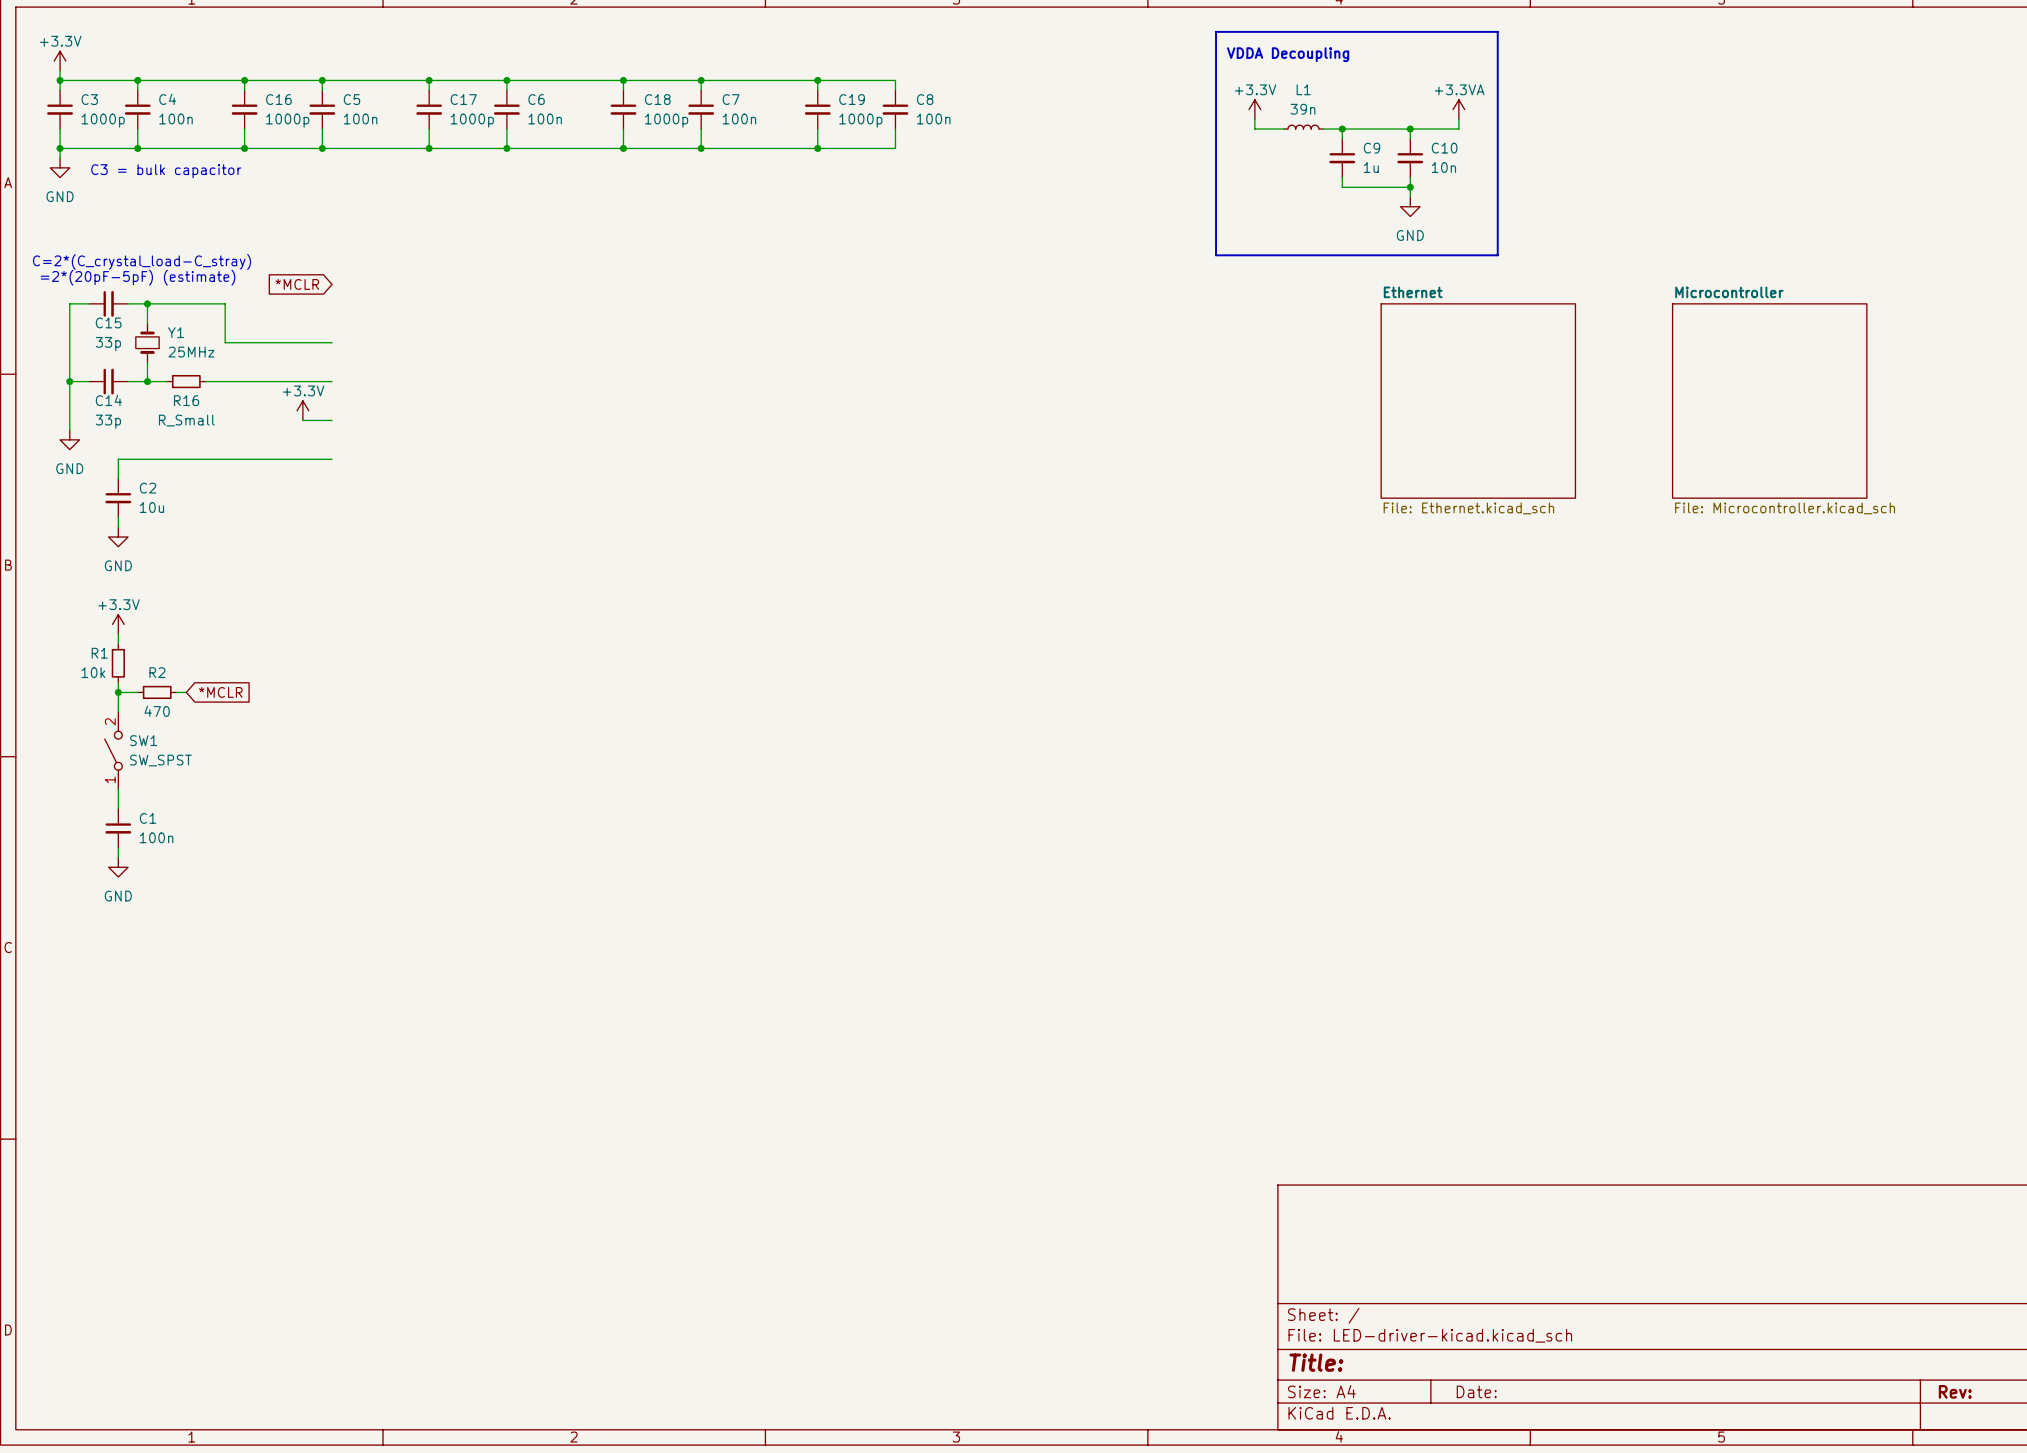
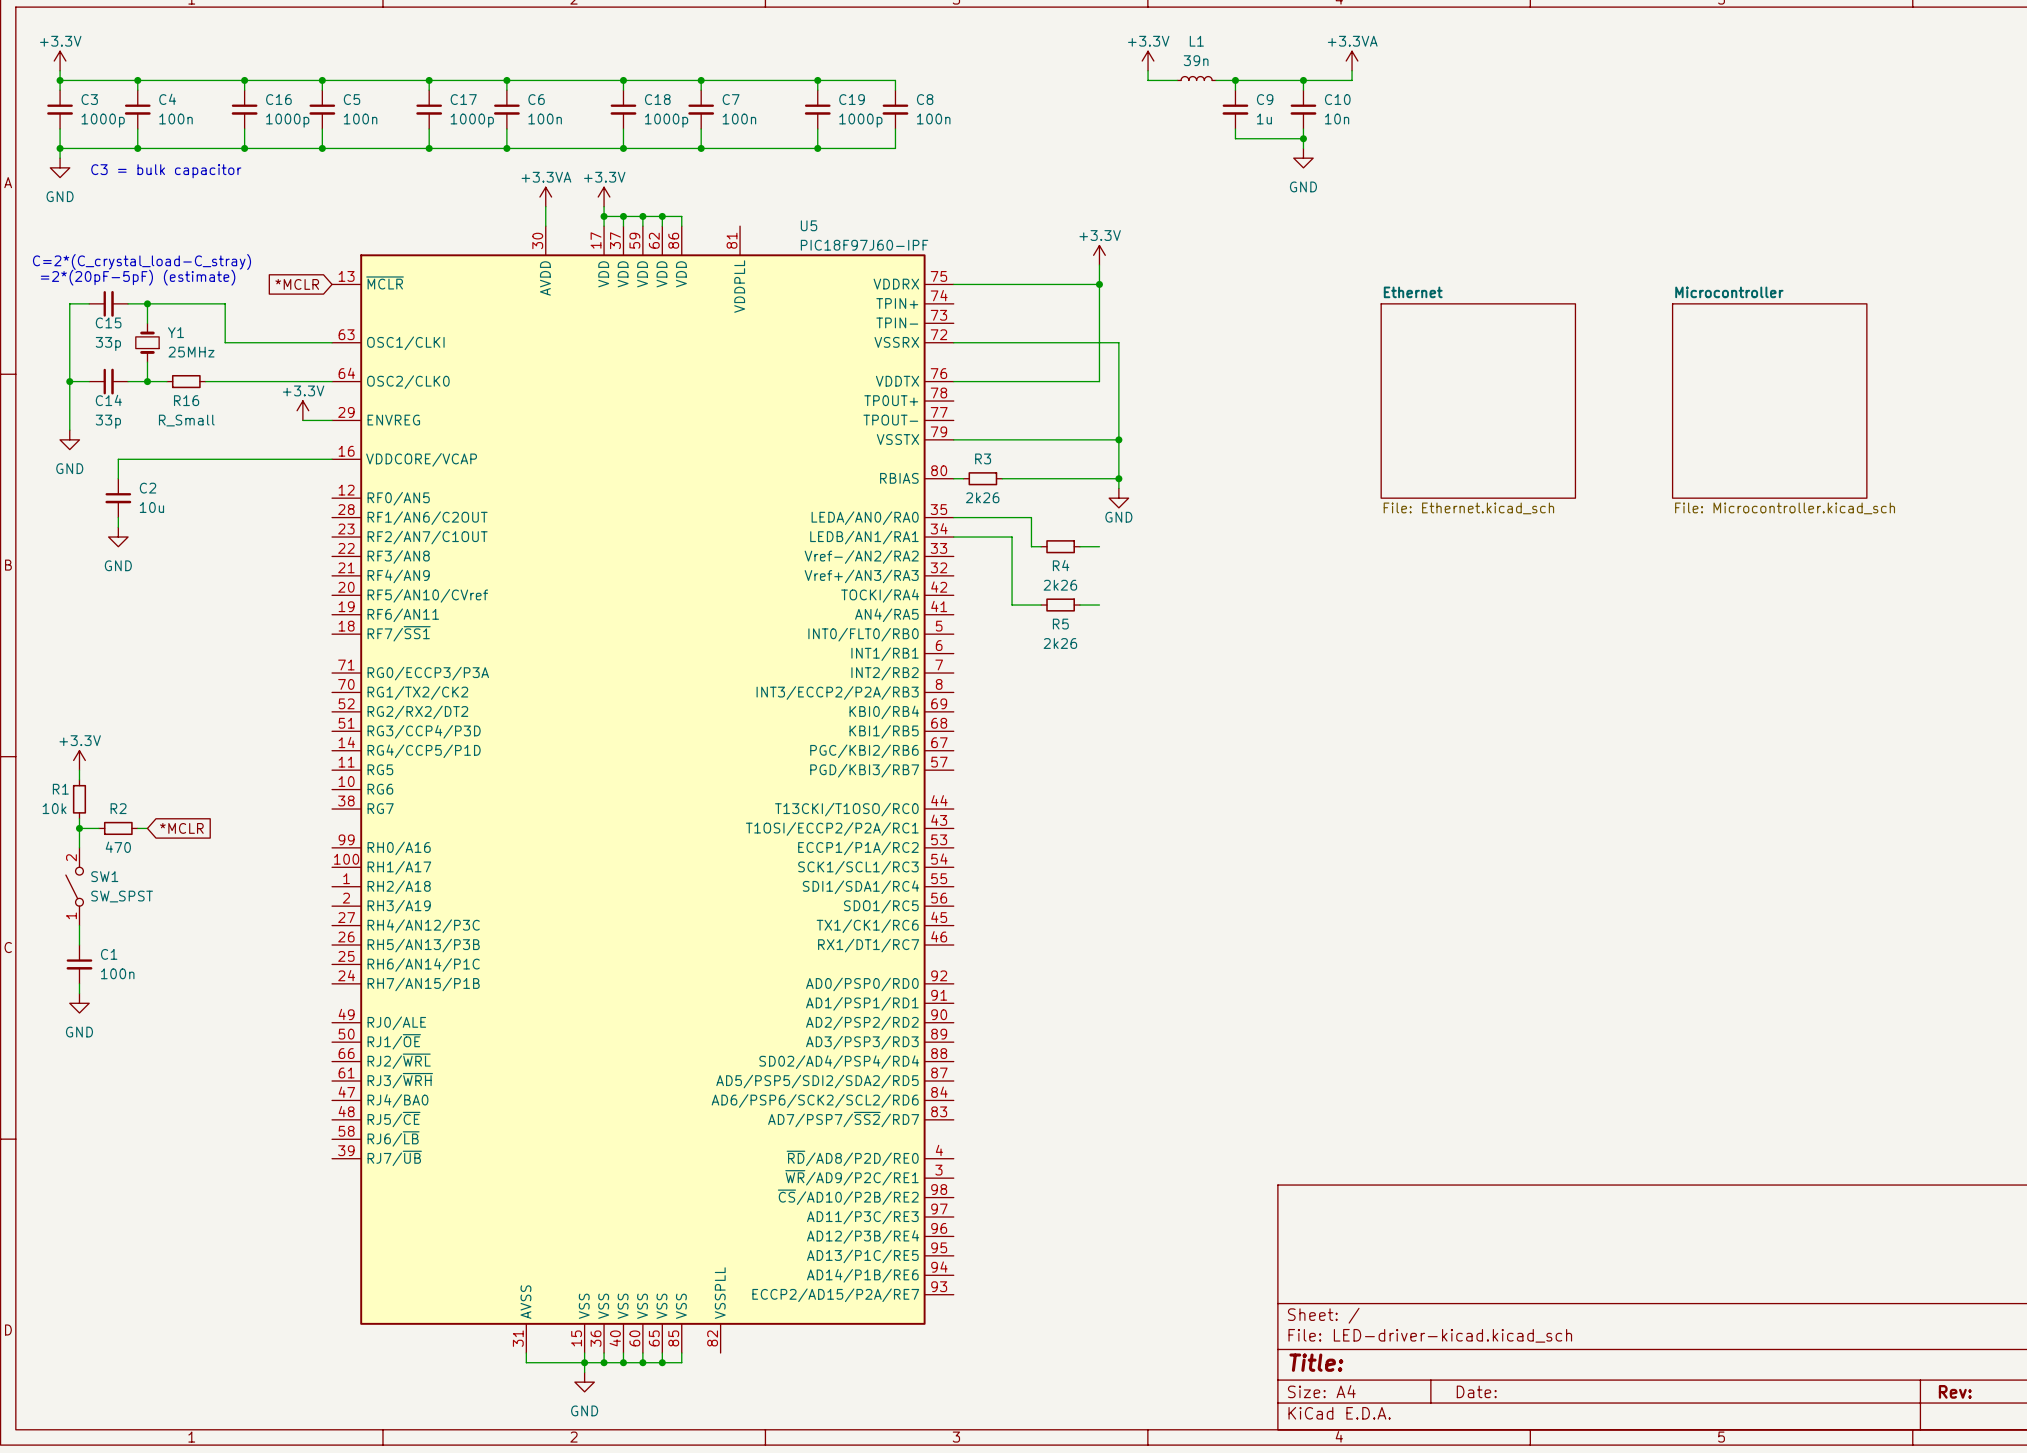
line: (1216, 31) (1497, 31) (1497, 255) (1216, 255) (1216, 31) -> none
text: VDDA Decoupling (1288, 54) -> none
power symbol: none -> +3.3V (1148, 61)
junction: none -> (1235, 80)
junction: none -> (1303, 80)
power symbol: +3.3V (1254, 109) -> none
power symbol position: +3.3VA (1458, 109) -> +3.3VA (1352, 61)
wire: (1254, 119) (1254, 129) (1284, 129) -> (1148, 70) (1148, 80) (1177, 80)
wire: (1458, 119) (1458, 129) (1322, 129) -> (1352, 70) (1352, 80) (1216, 80)
L1 position: (1303, 127) -> (1196, 78)
wire: (1342, 129) (1342, 138) -> (1235, 80) (1235, 90)
junction: (1342, 129) -> none
wire: (1410, 129) (1410, 138) -> (1303, 80) (1303, 90)
junction: (1410, 129) -> none
junction: none -> (1303, 138)
C9 position: (1342, 158) -> (1235, 109)
C10 position: (1410, 158) -> (1303, 109)
wire: (1342, 177) (1342, 187) (1410, 187) -> (1235, 129) (1235, 138) (1303, 138)
wire: (1410, 177) (1410, 197) -> (1303, 129) (1303, 148)
junction: (1410, 187) -> none
power symbol: none -> +3.3VA (545, 197)
power symbol: none -> +3.3V (604, 197)
wire: none -> (545, 206) (545, 226)
wire: none -> (604, 206) (604, 226)
power symbol position: GND (1410, 206) -> GND (1303, 158)
wire: none -> (604, 216) (681, 216) (681, 226)
junction: none -> (604, 216)
wire: none -> (623, 216) (623, 226)
junction: none -> (623, 216)
wire: none -> (642, 216) (642, 226)
junction: none -> (642, 216)
wire: none -> (662, 216) (662, 226)
junction: none -> (662, 216)
power symbol: none -> +3.3V (1099, 255)
wire: none -> (1099, 265) (1099, 381) (953, 381)
wire: none -> (953, 284) (1099, 284)
junction: none -> (1099, 284)
wire: none -> (953, 342) (1118, 342) (1118, 488)
wire: none -> (953, 439) (1118, 439)
junction: none -> (1118, 439)
wire: none -> (953, 478) (963, 478)
R3: none -> 2k26 (982, 478)
wire: none -> (1002, 478) (1118, 478)
junction: none -> (1118, 478)
power symbol: none -> GND (1118, 498)
wire: none -> (953, 517) (1031, 517) (1031, 546) (1041, 546)
wire: none -> (953, 537) (1012, 537) (1012, 605) (1041, 605)
R4: none -> 2k26 (1060, 546)
wire: none -> (1080, 546) (1099, 546)
R5: none -> 2k26 (1060, 605)
wire: none -> (1080, 605) (1099, 605)
power symbol position: +3.3V (118, 624) -> +3.3V (79, 760)
wire: (118, 634) (118, 643) -> (79, 770) (79, 779)
R1 position: (118, 663) -> (79, 799)
wire: (118, 682) (118, 711) -> (79, 818) (79, 847)
wire: (118, 692) (137, 692) -> (79, 828) (98, 828)
junction: (118, 692) -> none
R2 position: (157, 692) -> (118, 828)
wire: (176, 692) (186, 692) -> (137, 828) (147, 828)
global label position: *MCLR (220, 692) -> *MCLR (181, 828)
SW1 position: (113, 750) -> (74, 886)
wire: (118, 789) (118, 809) -> (79, 925) (79, 945)
U5: none -> PIC18F97J60-IPF (642, 789)
junction: none -> (79, 828)
C1 position: (118, 828) -> (79, 964)
wire: (118, 847) (118, 857) -> (79, 983) (79, 993)
power symbol position: GND (118, 867) -> GND (79, 1003)
wire: none -> (526, 1352) (526, 1362) (681, 1362) (681, 1352)
wire: none -> (584, 1352) (584, 1372)
wire: none -> (604, 1352) (604, 1362)
wire: none -> (623, 1352) (623, 1362)
wire: none -> (642, 1352) (642, 1362)
wire: none -> (662, 1352) (662, 1362)
junction: none -> (584, 1362)
junction: none -> (604, 1362)
junction: none -> (623, 1362)
junction: none -> (642, 1362)
junction: none -> (662, 1362)
power symbol: none -> GND (584, 1382)

